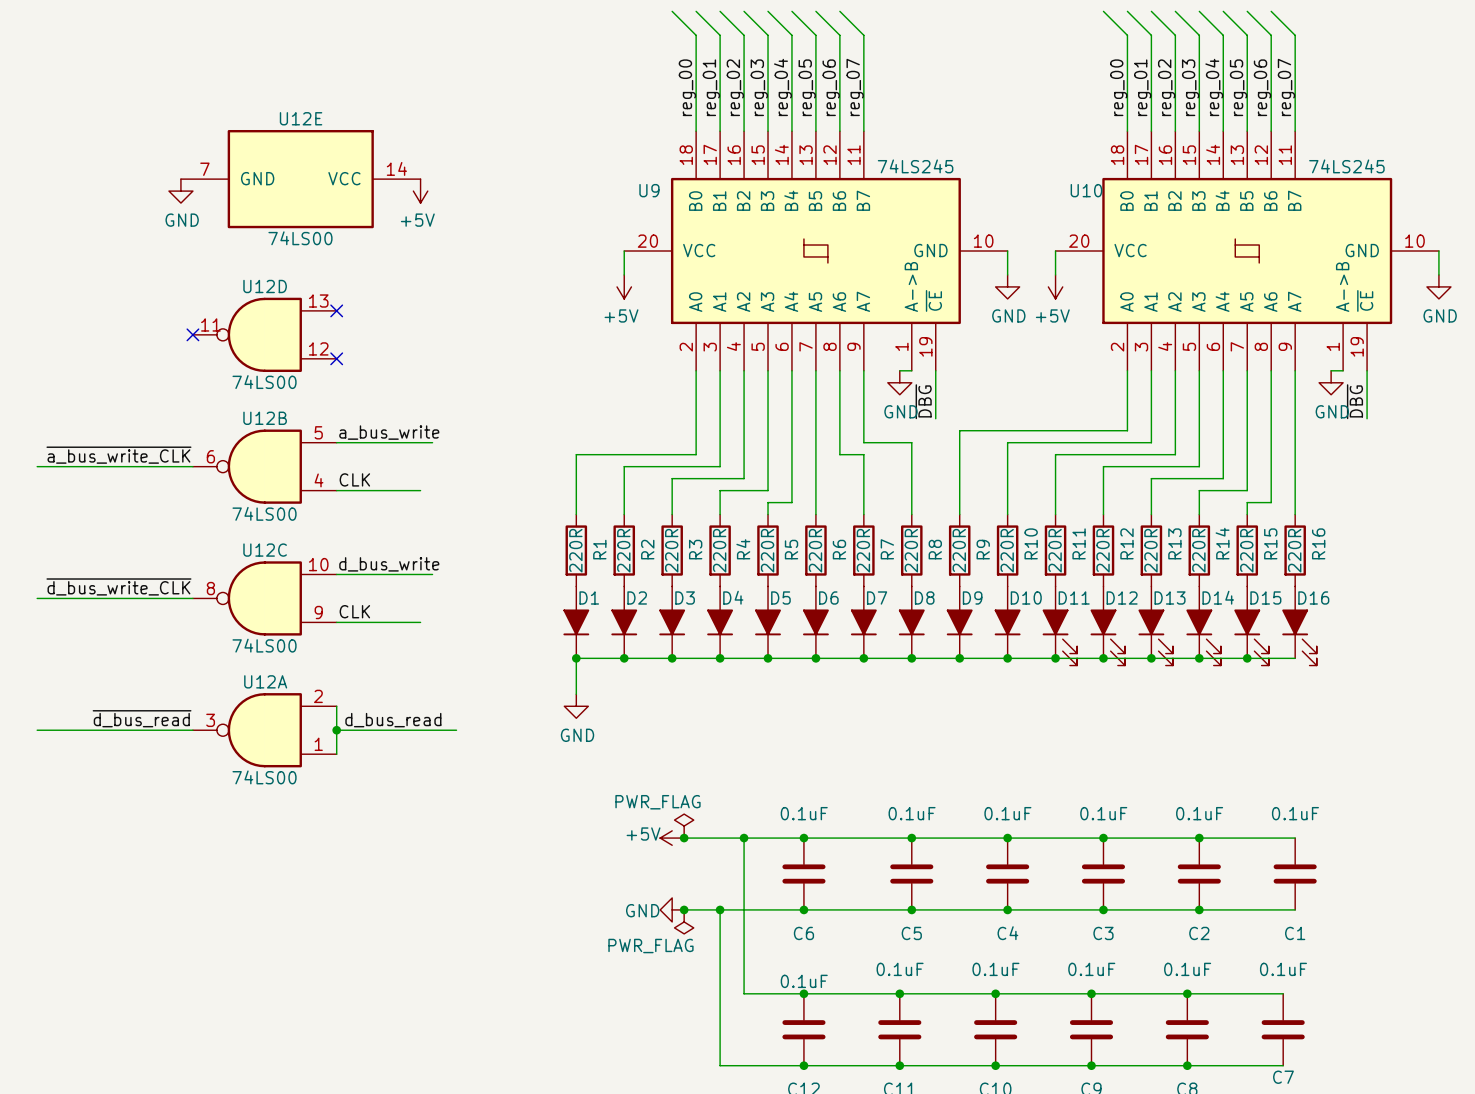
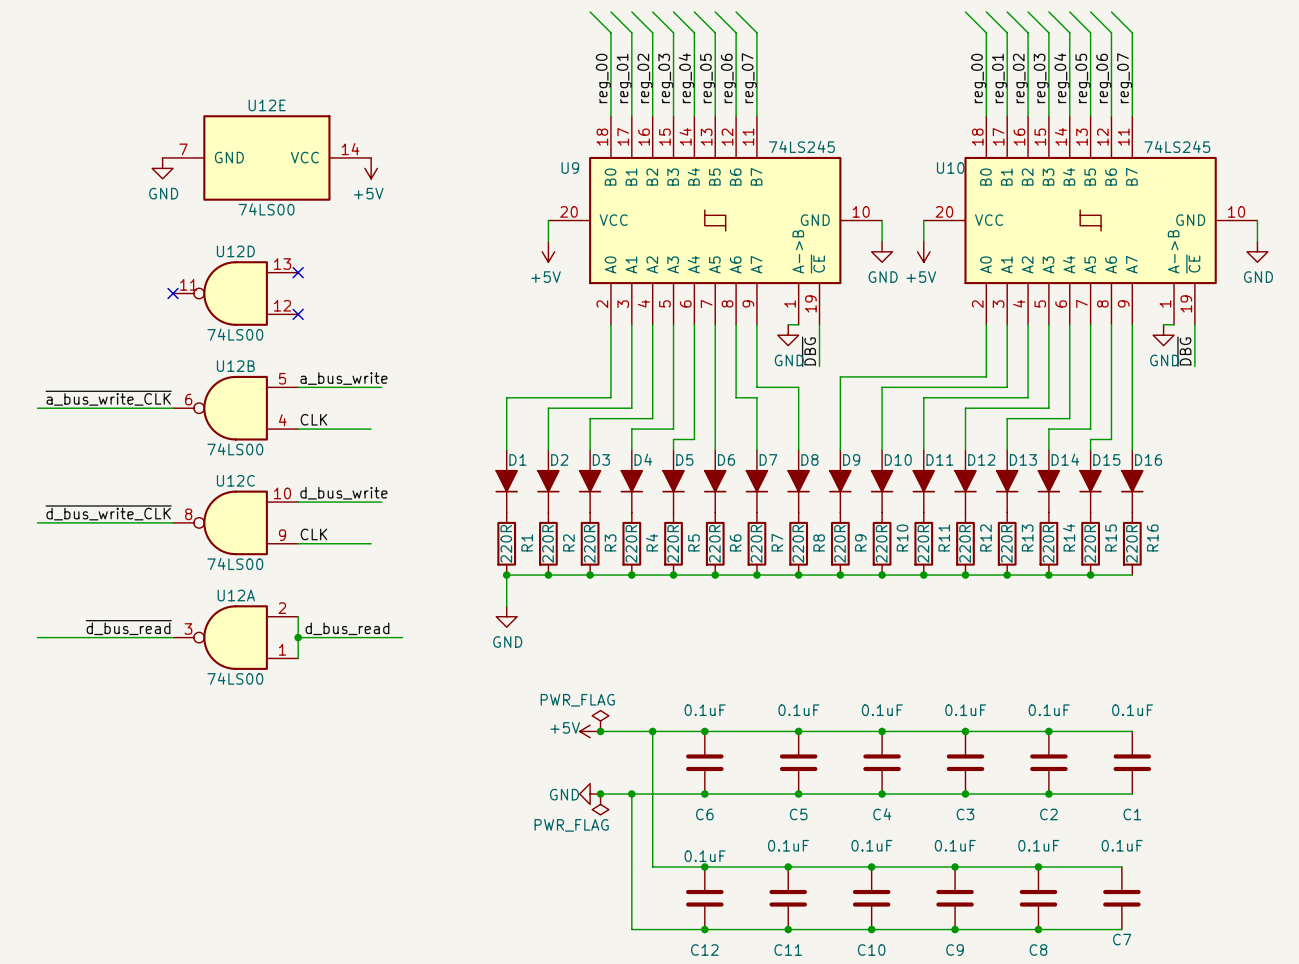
R1 position: (576, 550) -> (506, 543)
R2 position: (624, 550) -> (548, 543)
R3 position: (672, 550) -> (590, 543)
R4 position: (720, 550) -> (631, 543)
R5 position: (768, 550) -> (673, 543)
R6 position: (815, 550) -> (715, 543)
R7 position: (863, 550) -> (756, 543)
R8 position: (911, 550) -> (798, 543)
R9 position: (959, 550) -> (840, 543)
R10 position: (1007, 550) -> (882, 543)
R11 position: (1055, 550) -> (923, 543)
R12 position: (1103, 550) -> (965, 543)
R13 position: (1151, 550) -> (1007, 543)
R14 position: (1199, 550) -> (1048, 543)
R15 position: (1247, 550) -> (1090, 543)
R16 position: (1295, 550) -> (1132, 543)
D11 symbol: [1042, 586, 1078, 666] -> [912, 449, 936, 513]
D12 symbol: [1090, 586, 1126, 666] -> [954, 449, 977, 513]
D13 symbol: [1138, 586, 1173, 666] -> [995, 449, 1019, 513]
D14 symbol: [1186, 586, 1221, 666] -> [1037, 449, 1061, 513]
D15 symbol: [1234, 586, 1269, 666] -> [1079, 449, 1102, 513]
D16 symbol: [1282, 586, 1317, 666] -> [1121, 449, 1144, 513]
D1 position: (576, 622) -> (506, 481)
D2 position: (624, 622) -> (548, 481)
D3 position: (672, 622) -> (590, 481)
D4 position: (720, 622) -> (631, 481)
D5 position: (768, 622) -> (673, 481)
D6 position: (815, 622) -> (715, 481)
D7 position: (863, 622) -> (756, 481)
D8 position: (911, 622) -> (798, 481)
D9 position: (959, 622) -> (840, 481)
D10 position: (1007, 622) -> (882, 481)

